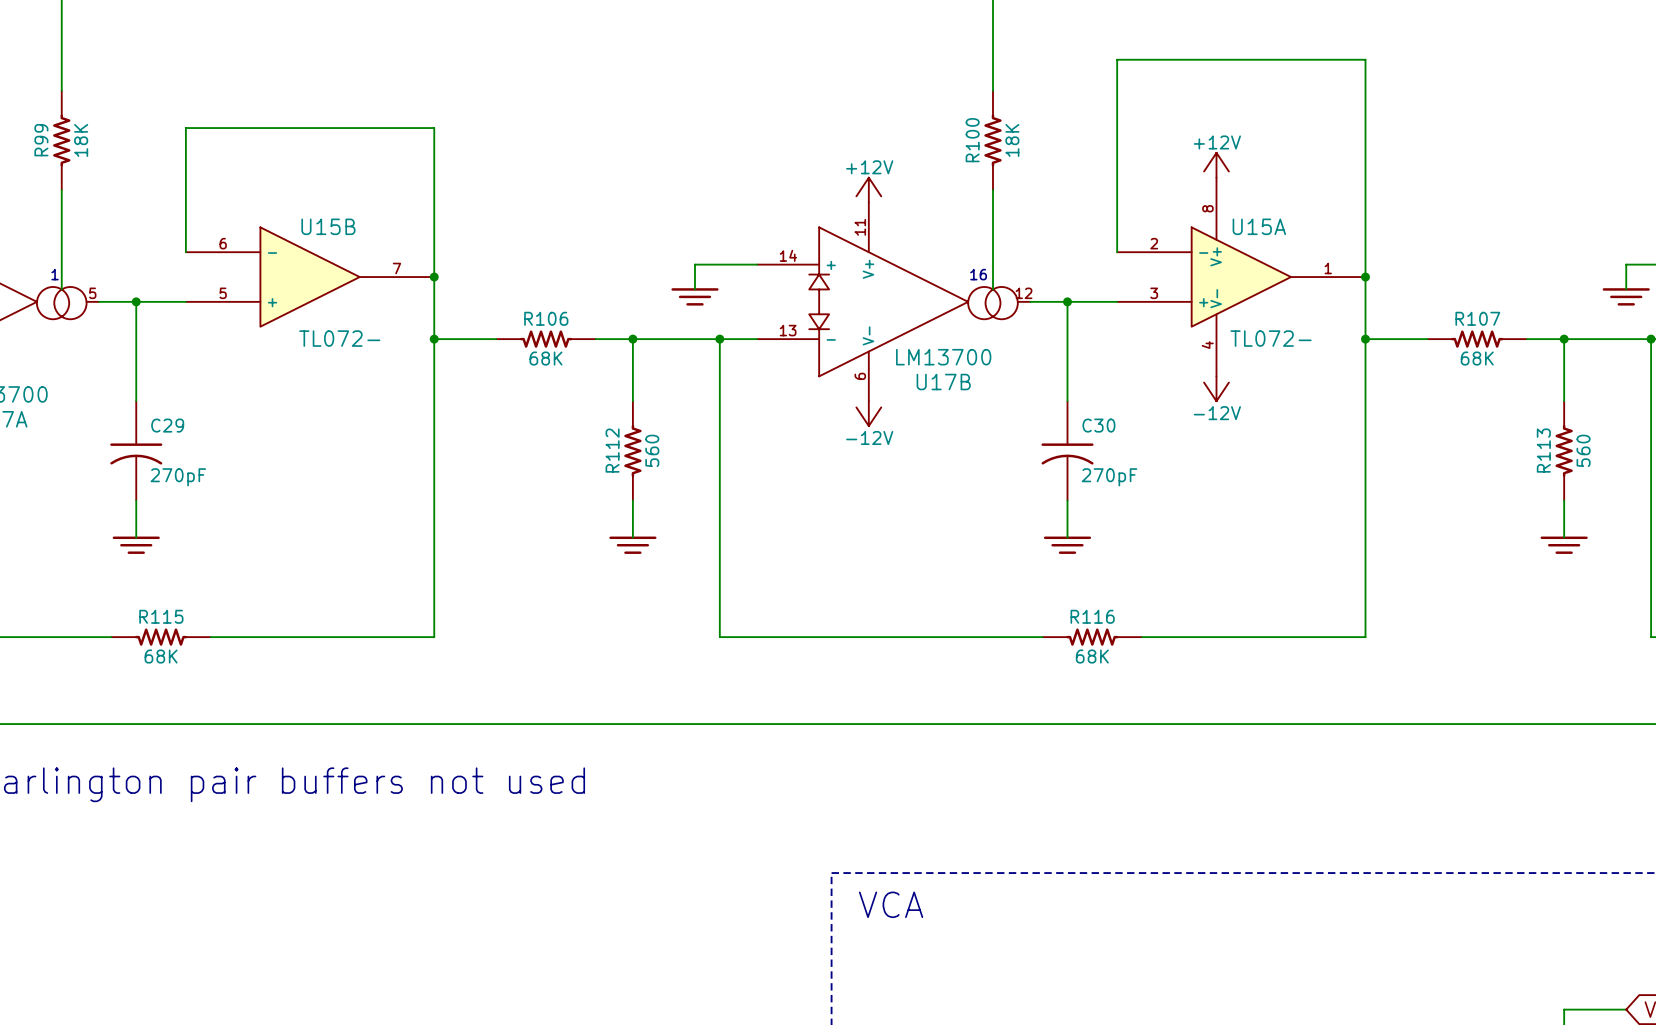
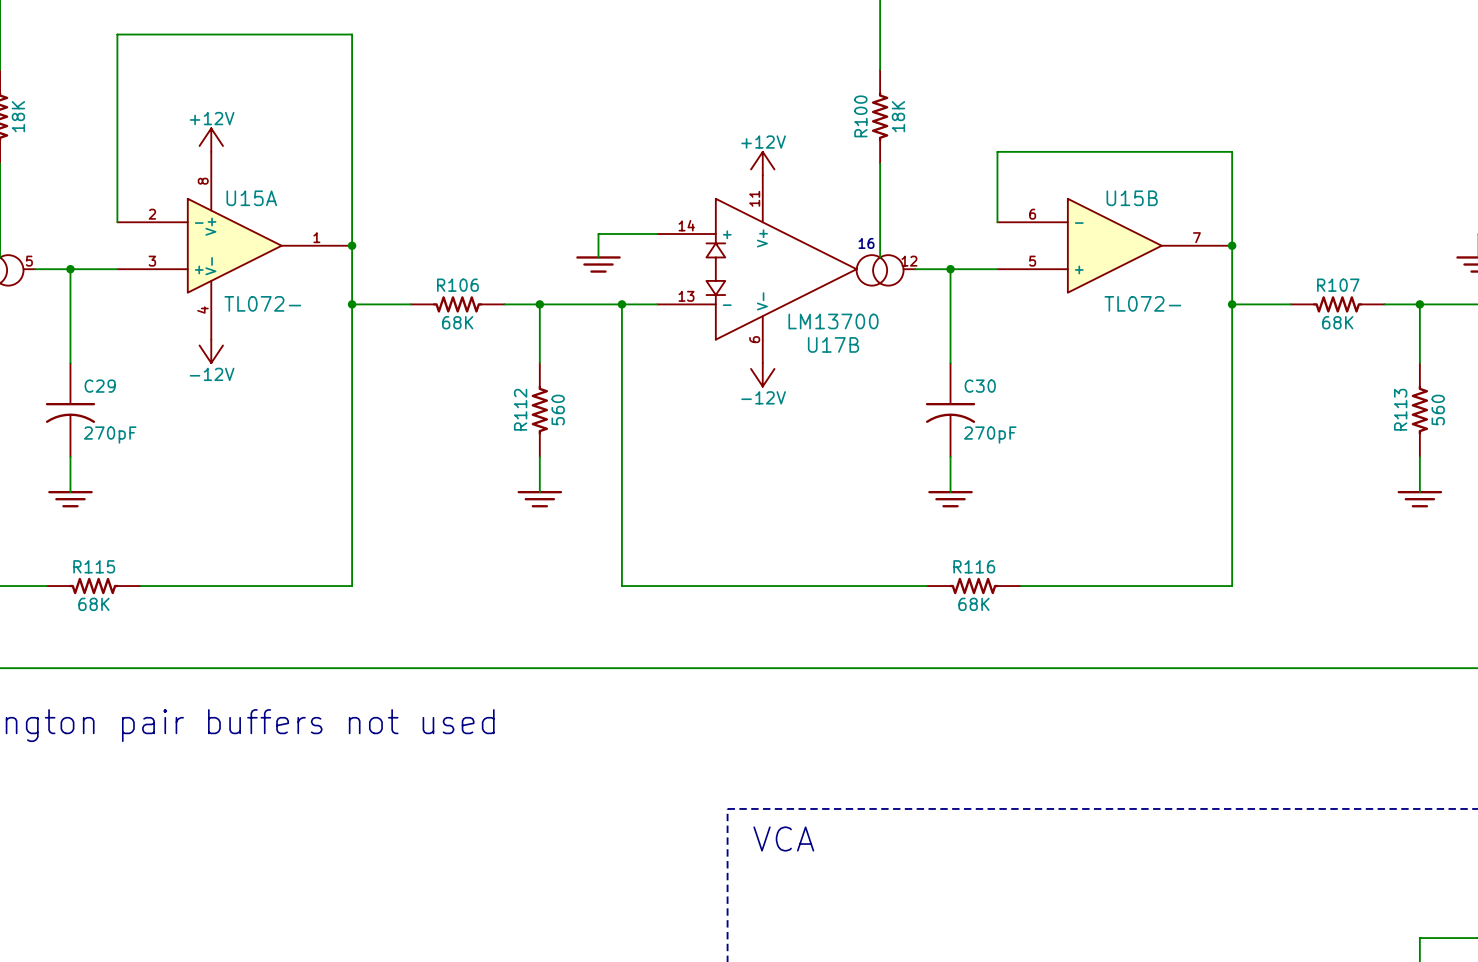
wire: (185, 128) (434, 128) -> (117, 104) (117, 34) (352, 34) (352, 104)
power symbol: none -> +12V (211, 140)
power symbol: +12V (1216, 165) -> none
wire: (1117, 177) (1117, 59) (1365, 59) (1365, 177) -> (997, 151) (1232, 151)
U15B position: (310, 277) -> (1114, 245)
U15A position: (1241, 277) -> (234, 245)
power symbol: none -> -12V (211, 351)
power symbol: -12V (1216, 388) -> none

